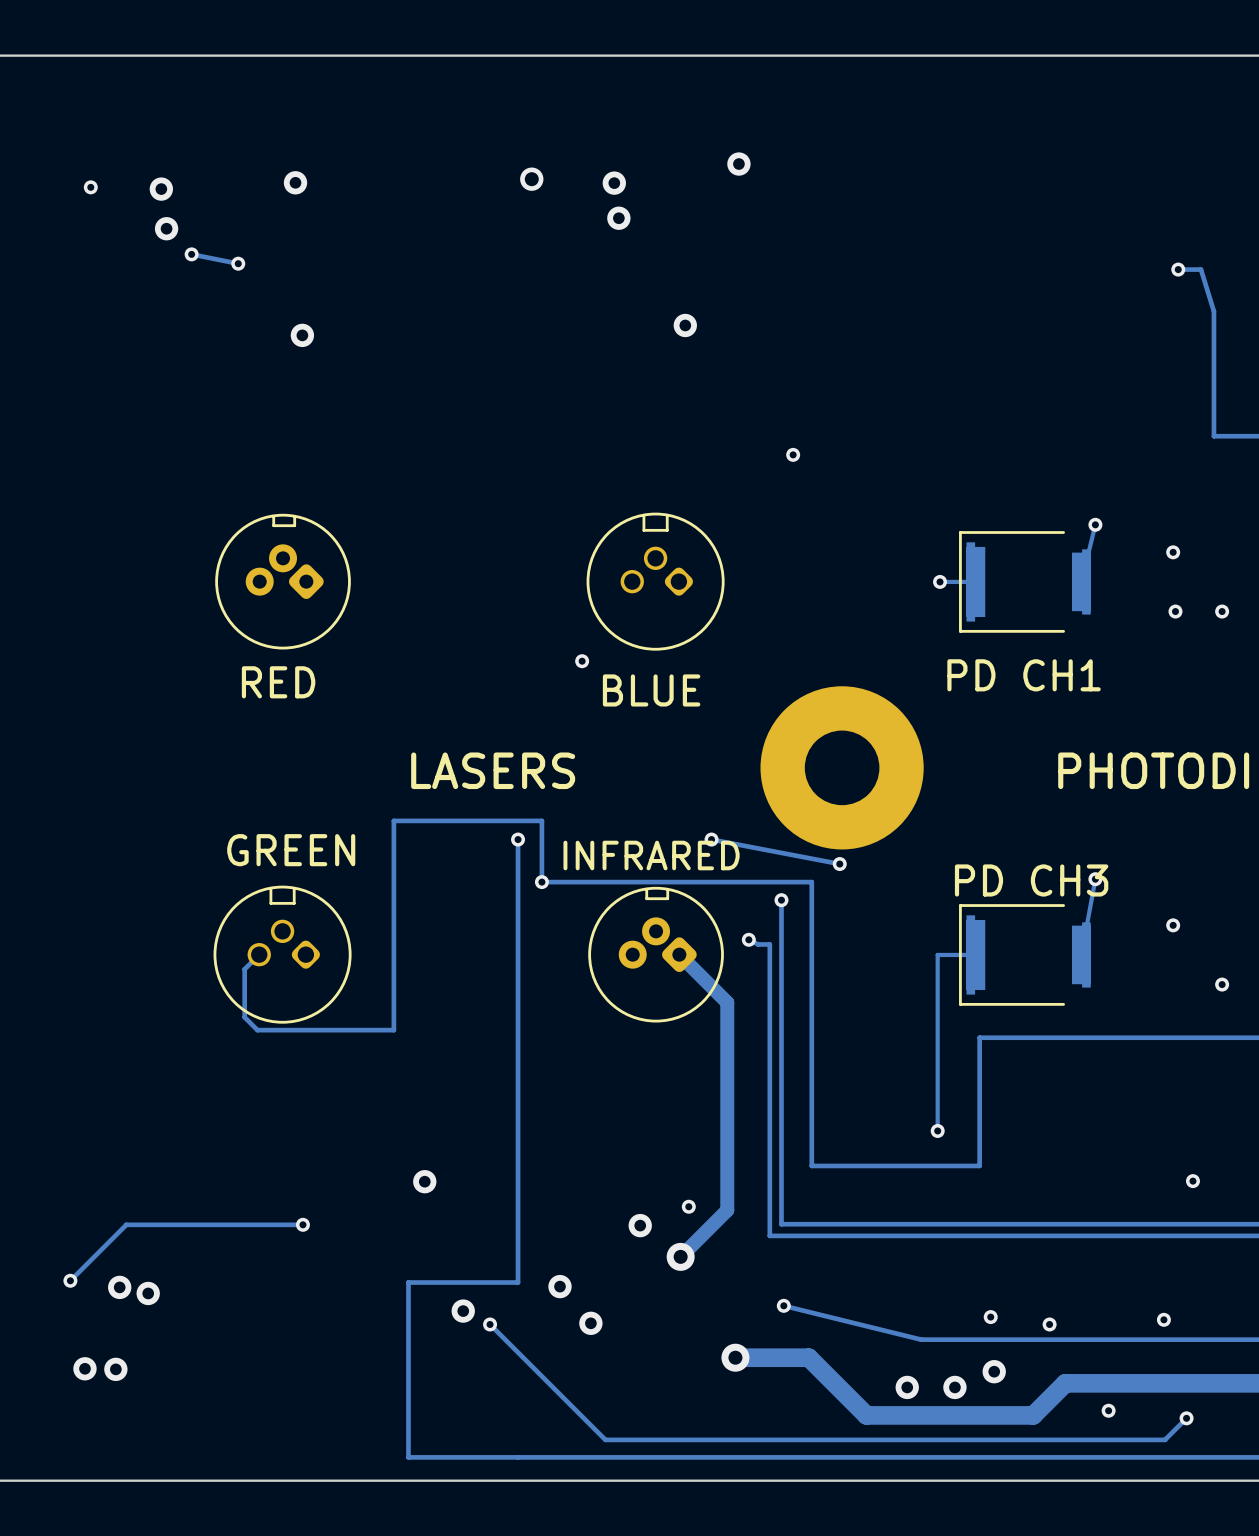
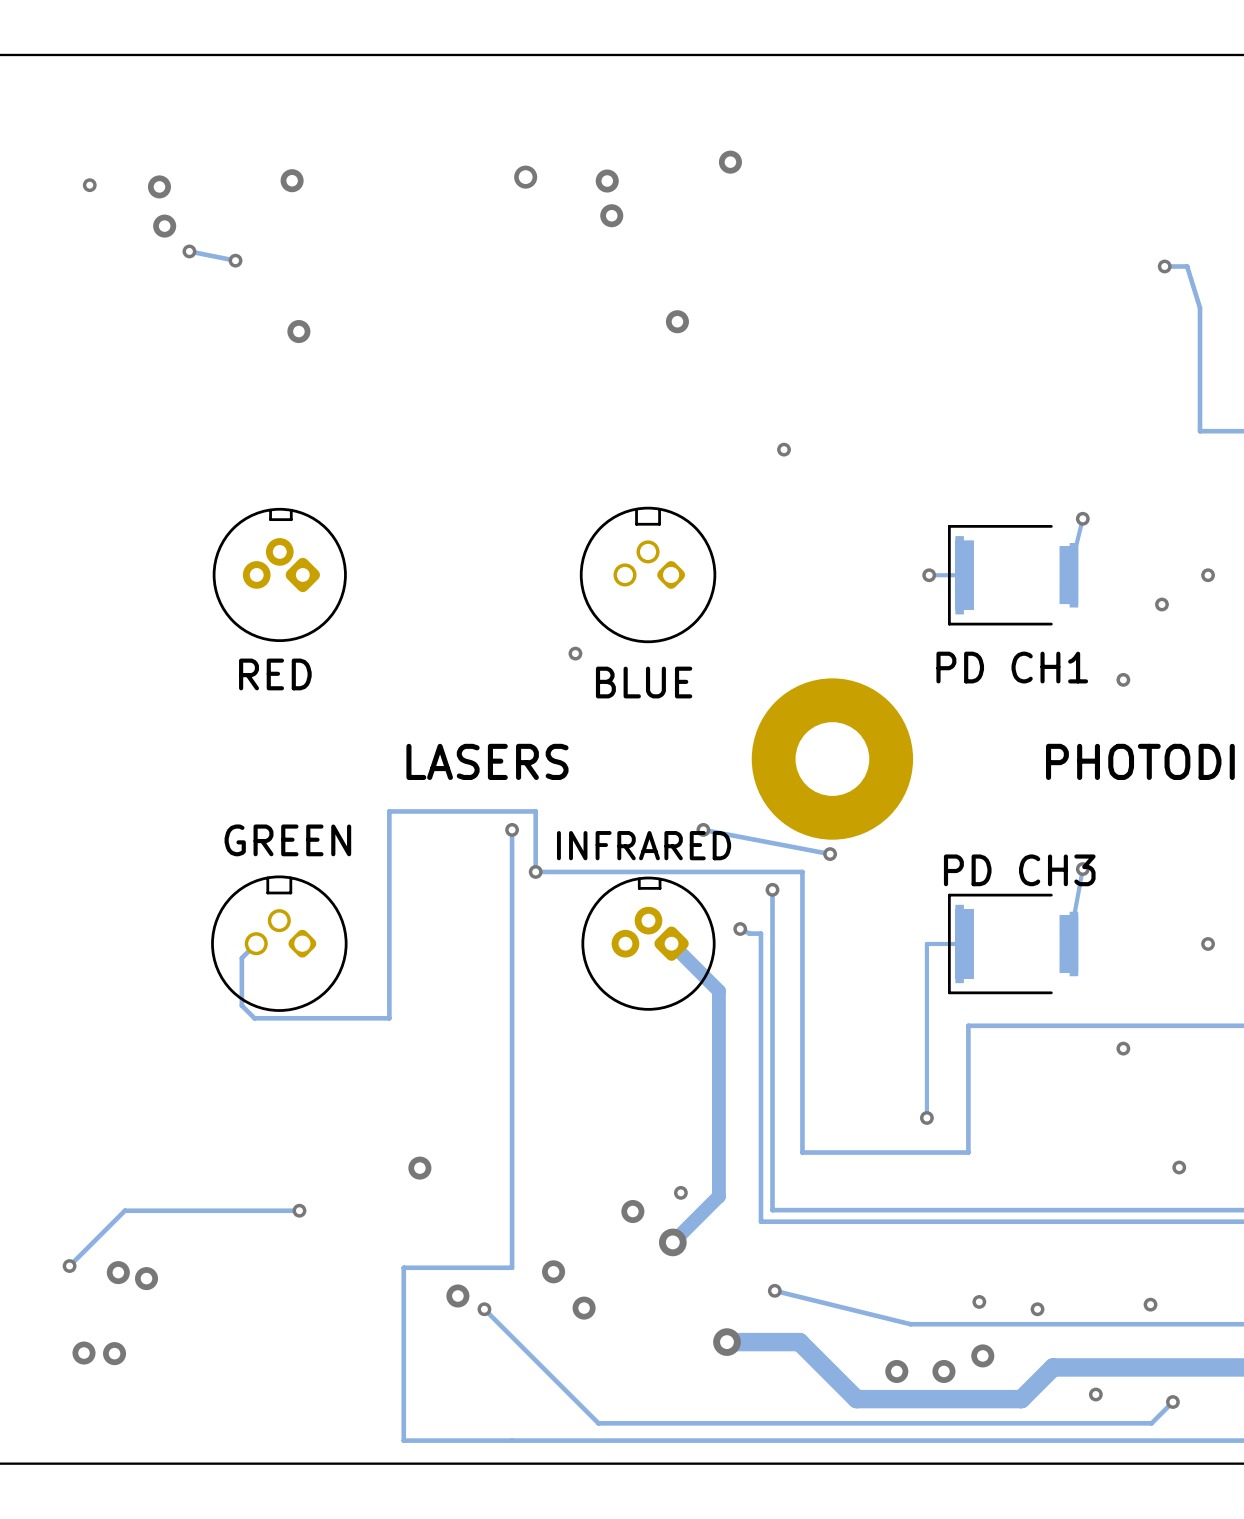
via: (1173, 552) -> none
via: none -> (1208, 575)
via: (1222, 611) -> none
via: none -> (1123, 679)
via: (1173, 925) -> none
via: none -> (1208, 943)
via: (1222, 984) -> none
via: none -> (1123, 1048)

